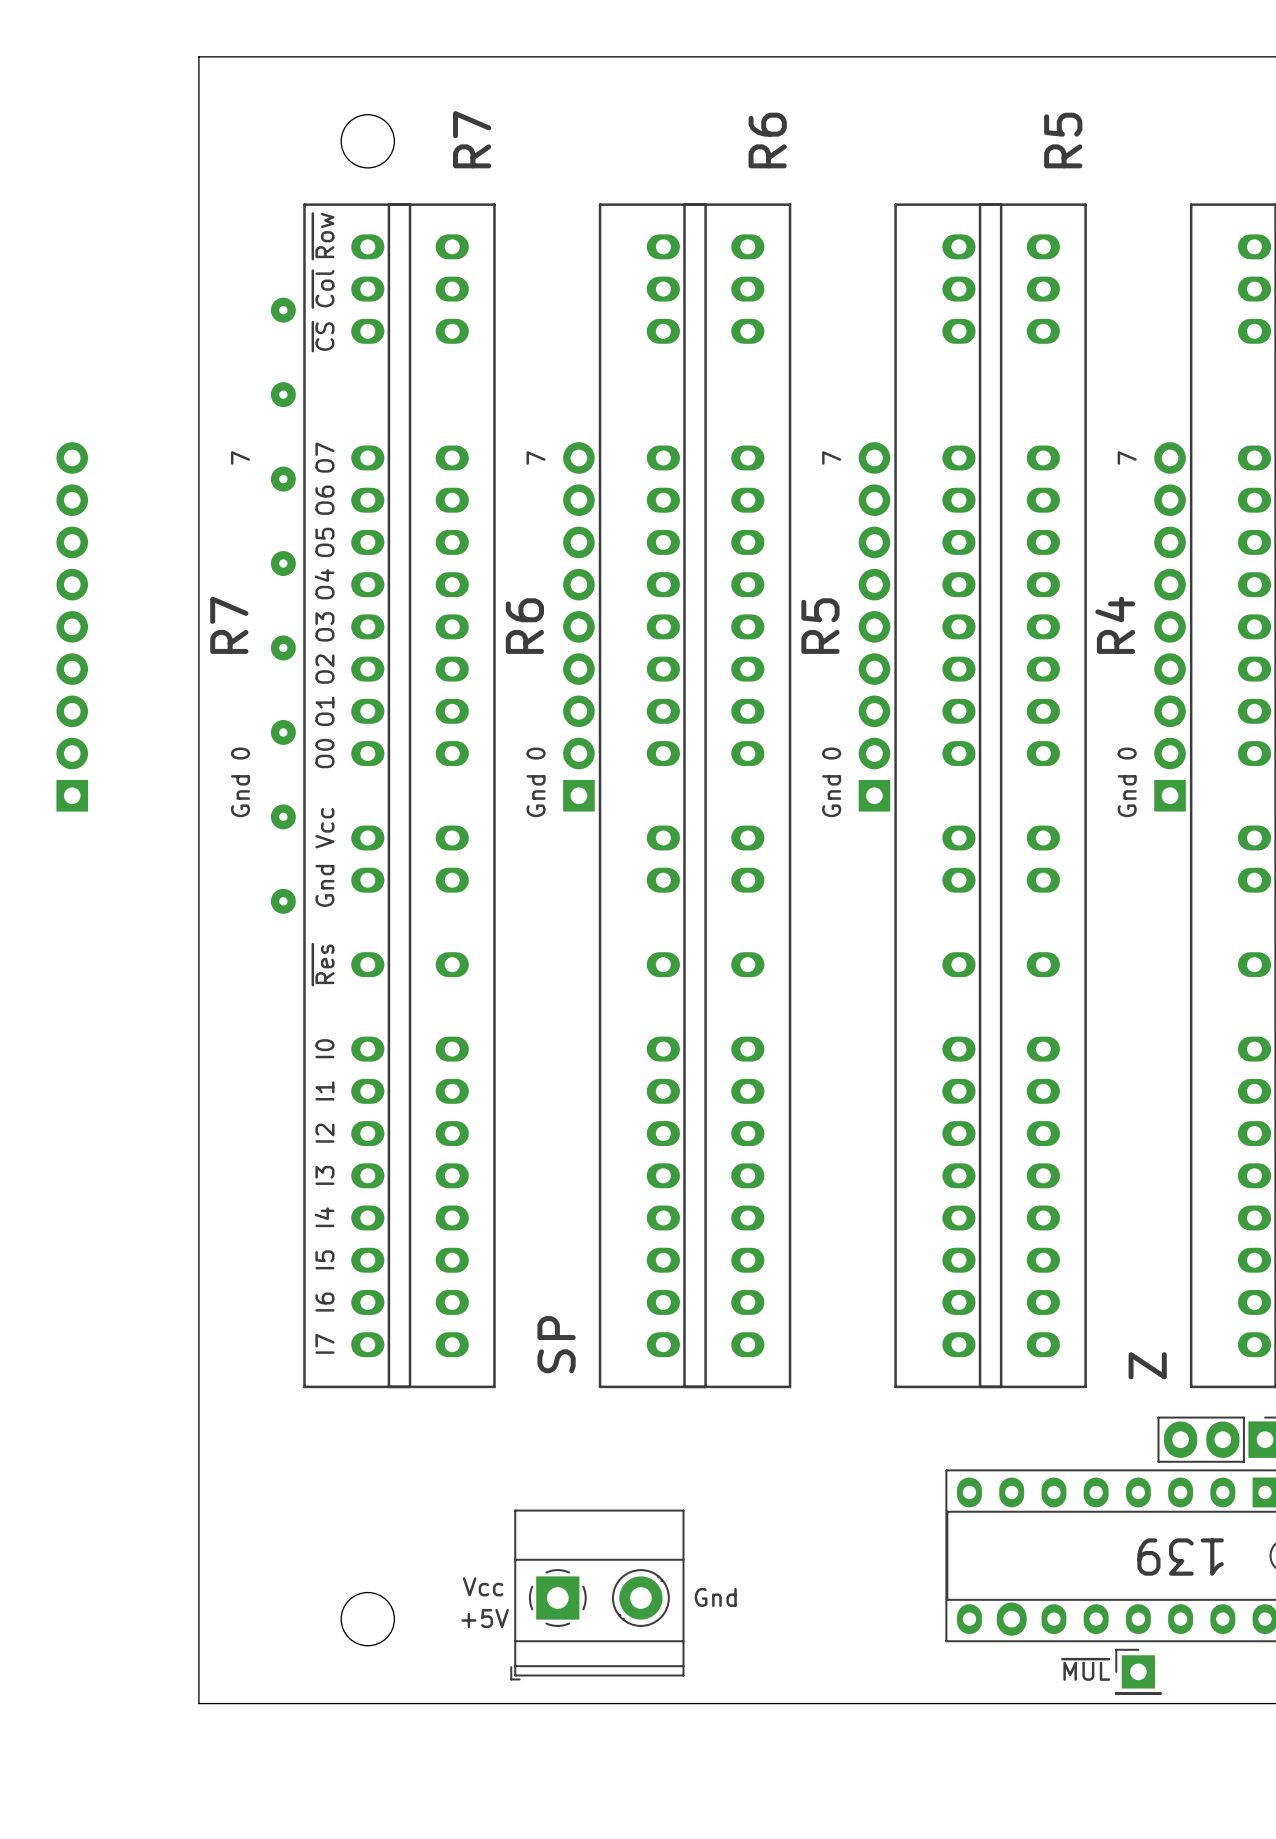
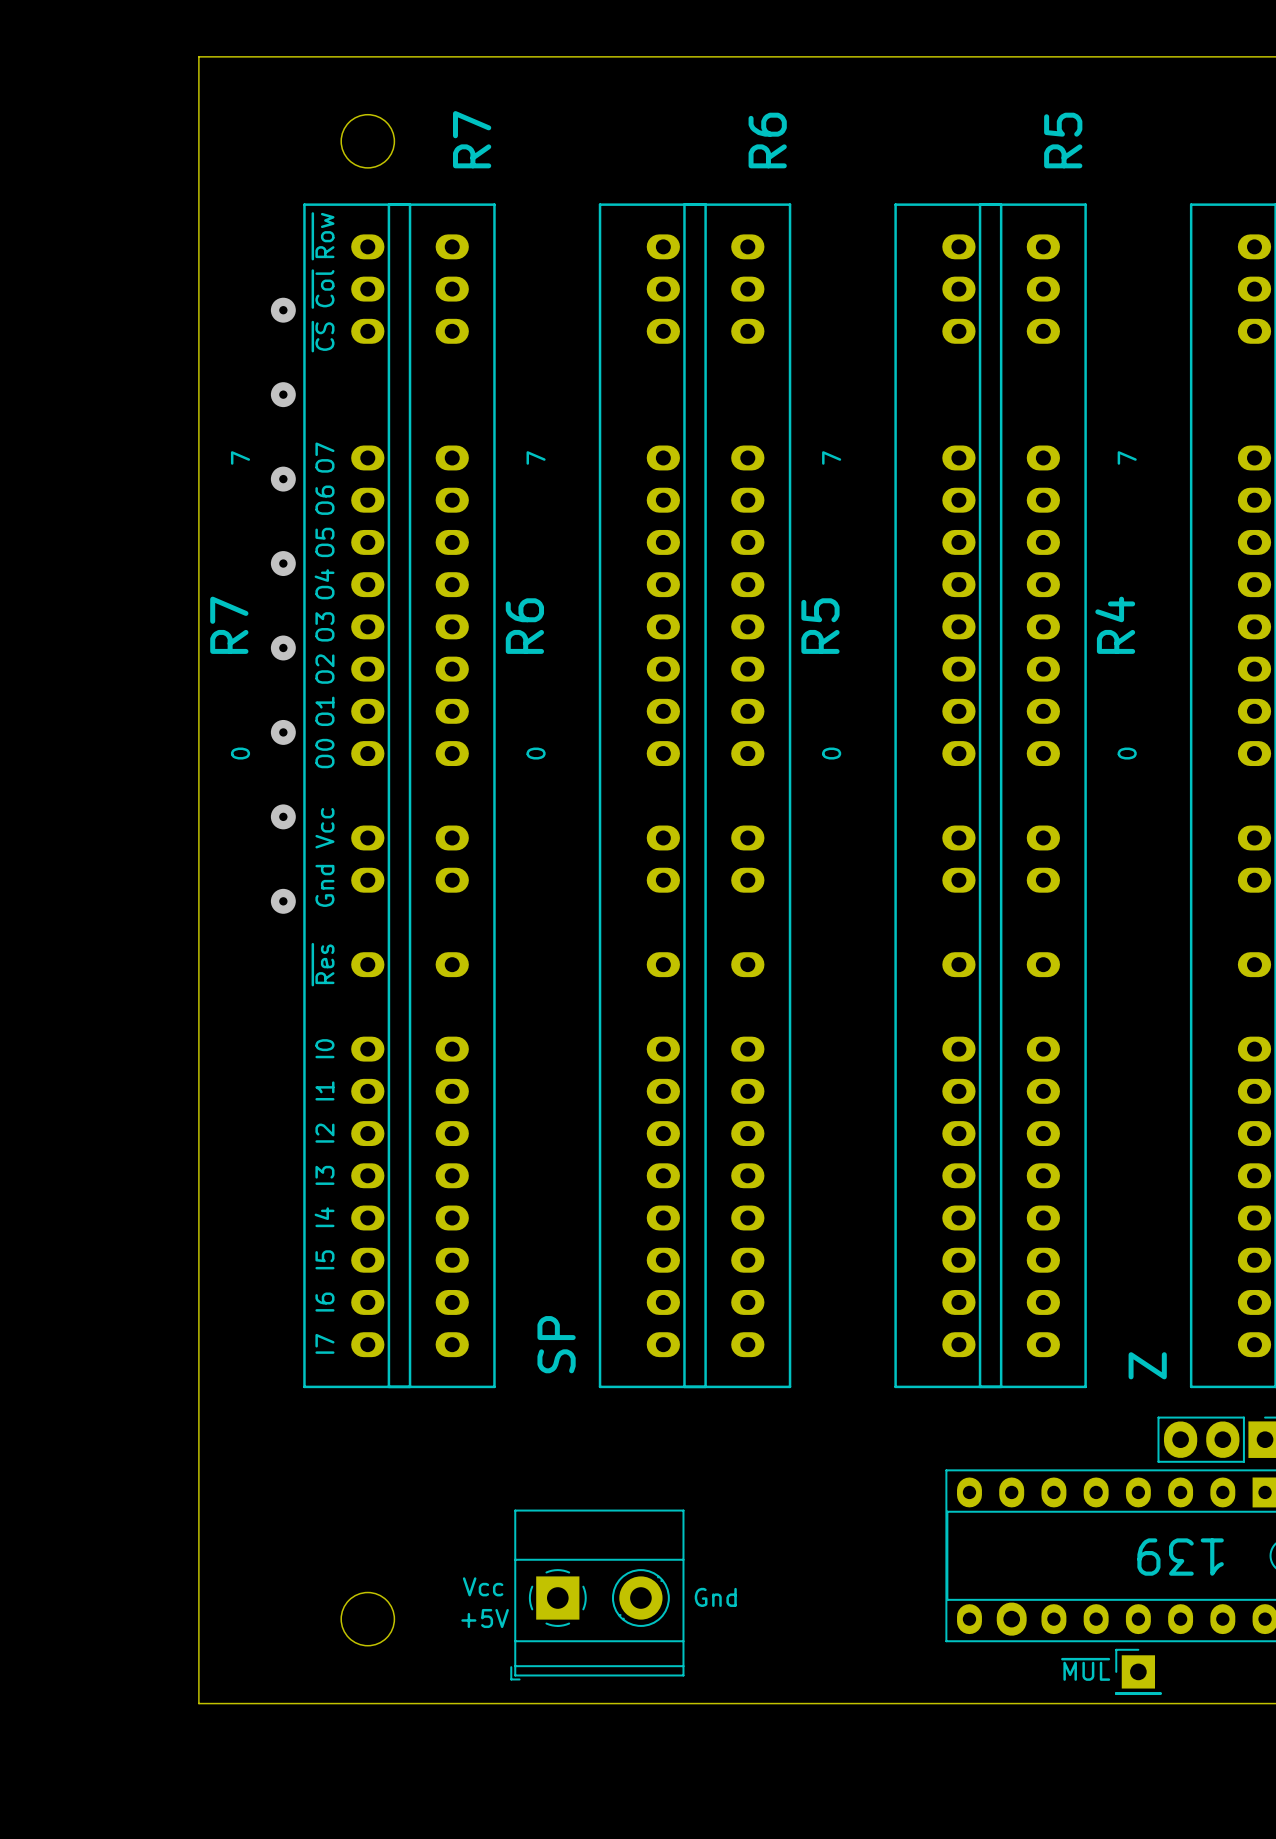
part: (72, 626) -> none
part: (578, 626) -> none
part: (874, 626) -> none
part: (1170, 626) -> none
text: Gnd (240, 796) -> none
text: Gnd (536, 796) -> none
text: Gnd (831, 796) -> none
text: Gnd (1127, 796) -> none

